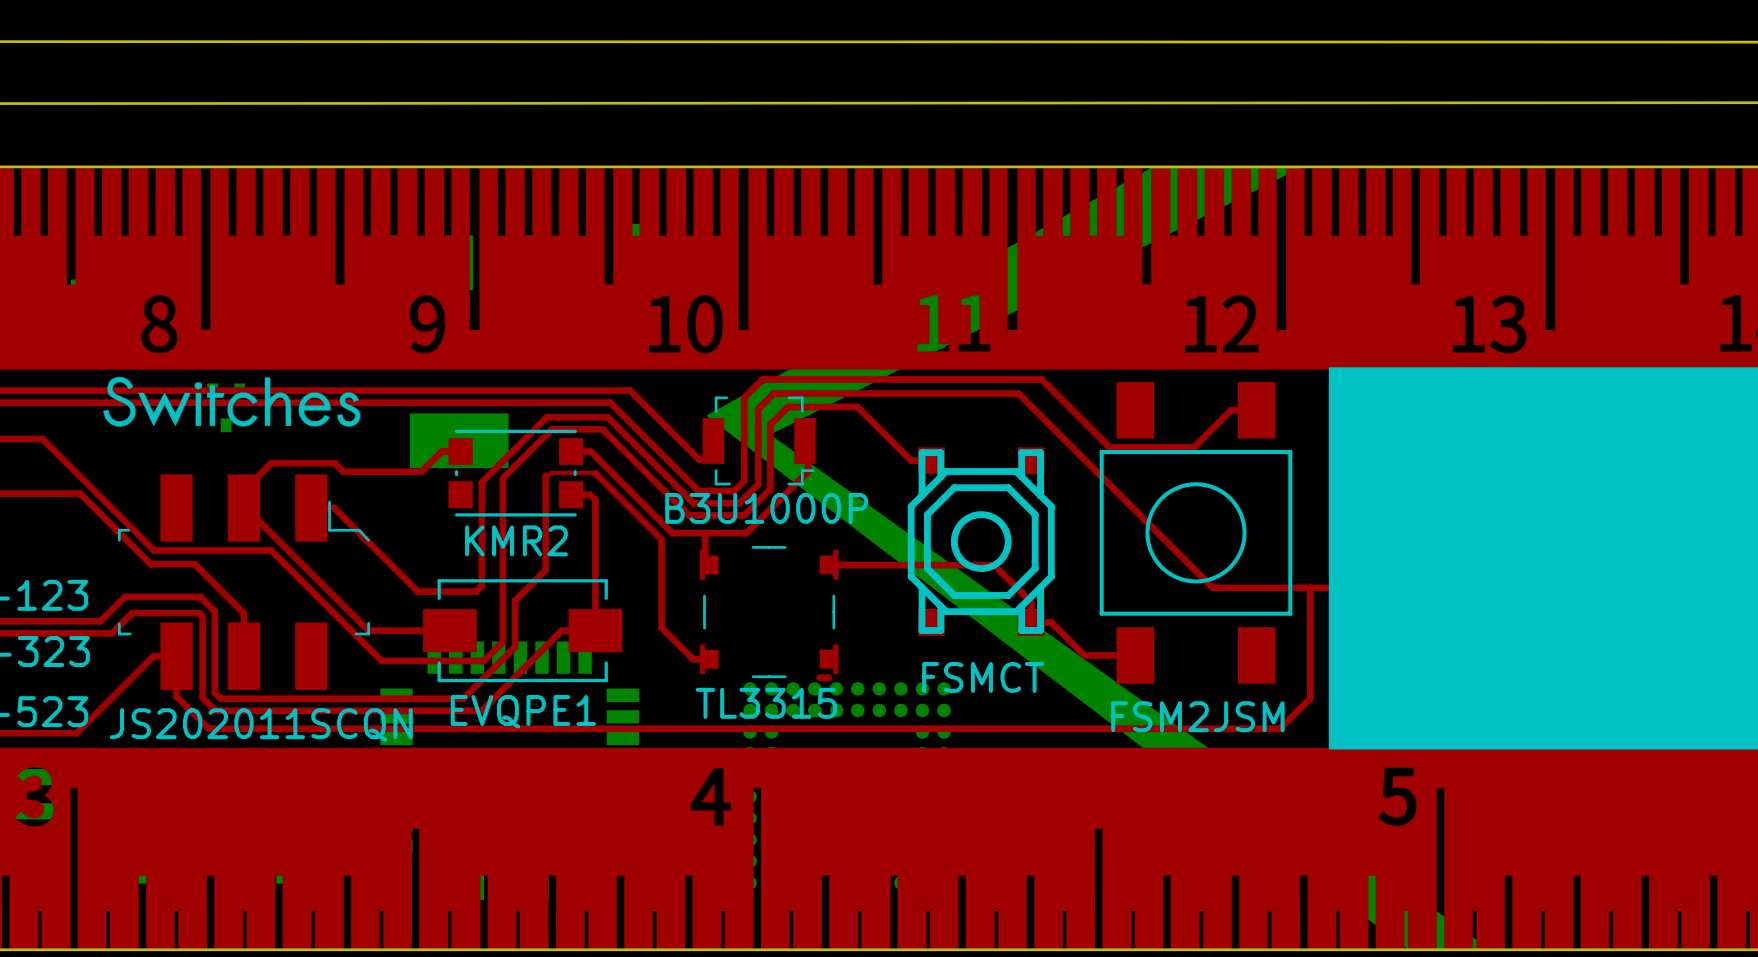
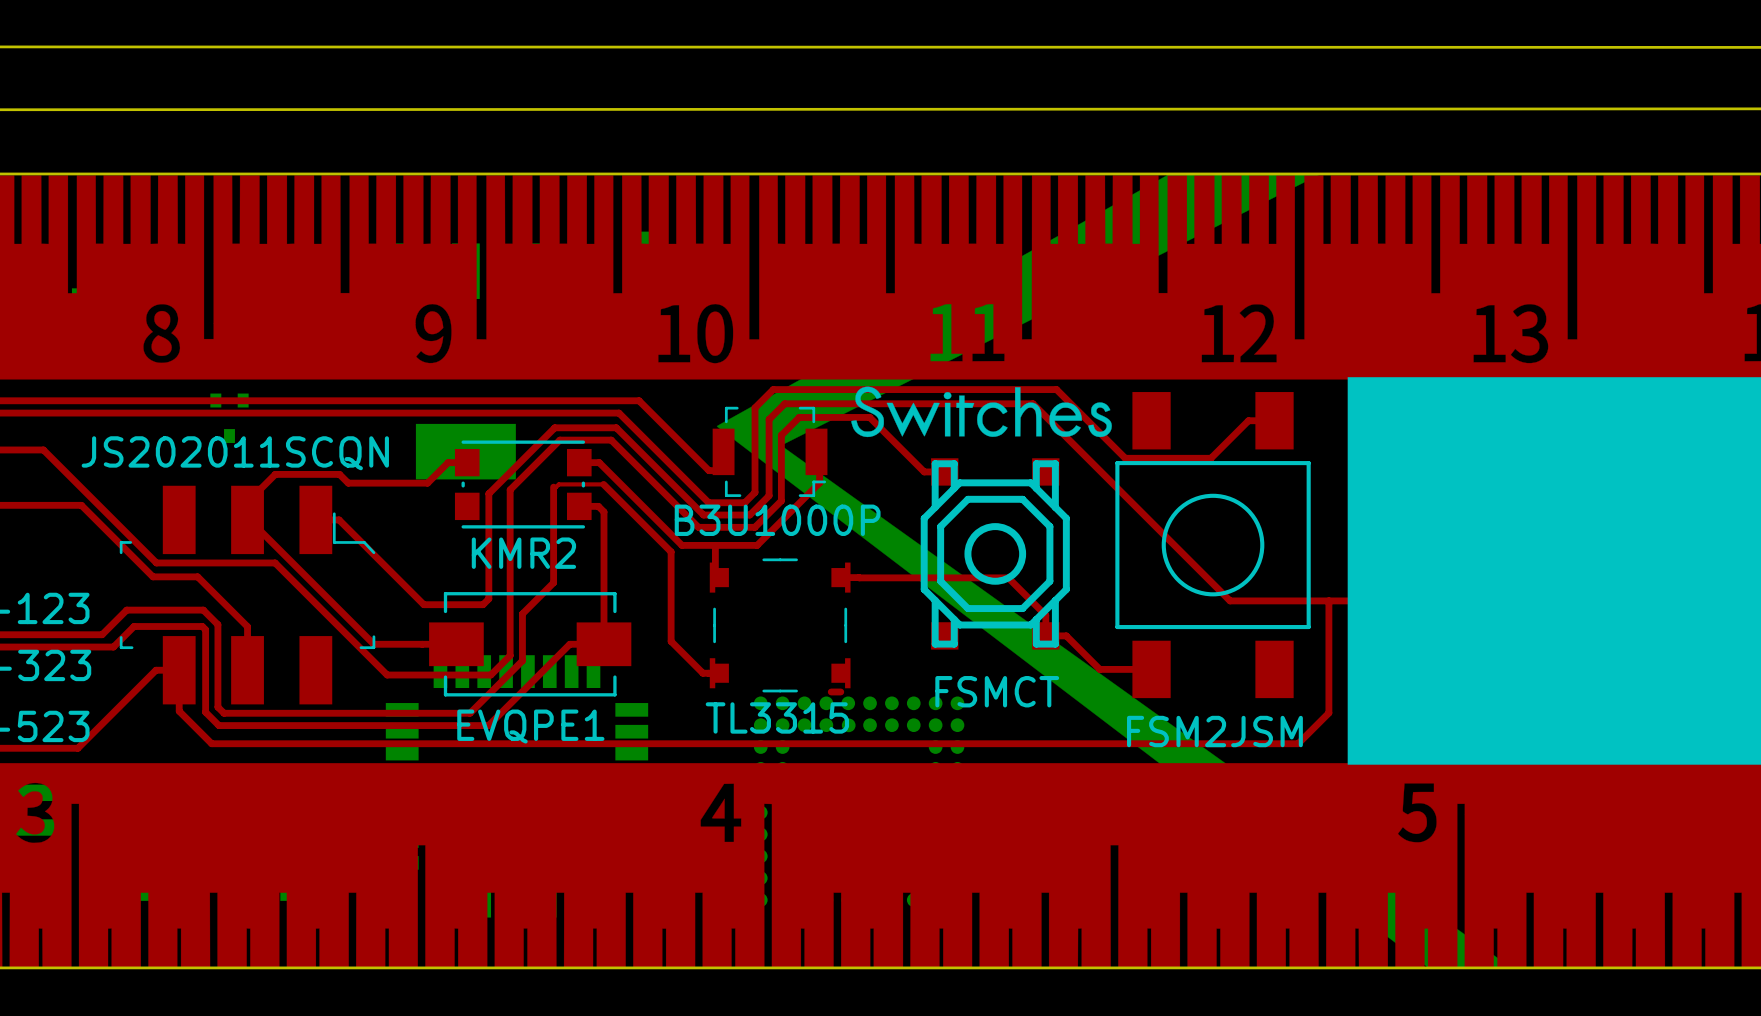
drawing: [103, 376, 361, 427] -> none
drawing: none -> [851, 386, 1112, 438]
part value position: JS202011SCQN (261, 724) -> JS202011SCQN (235, 453)

